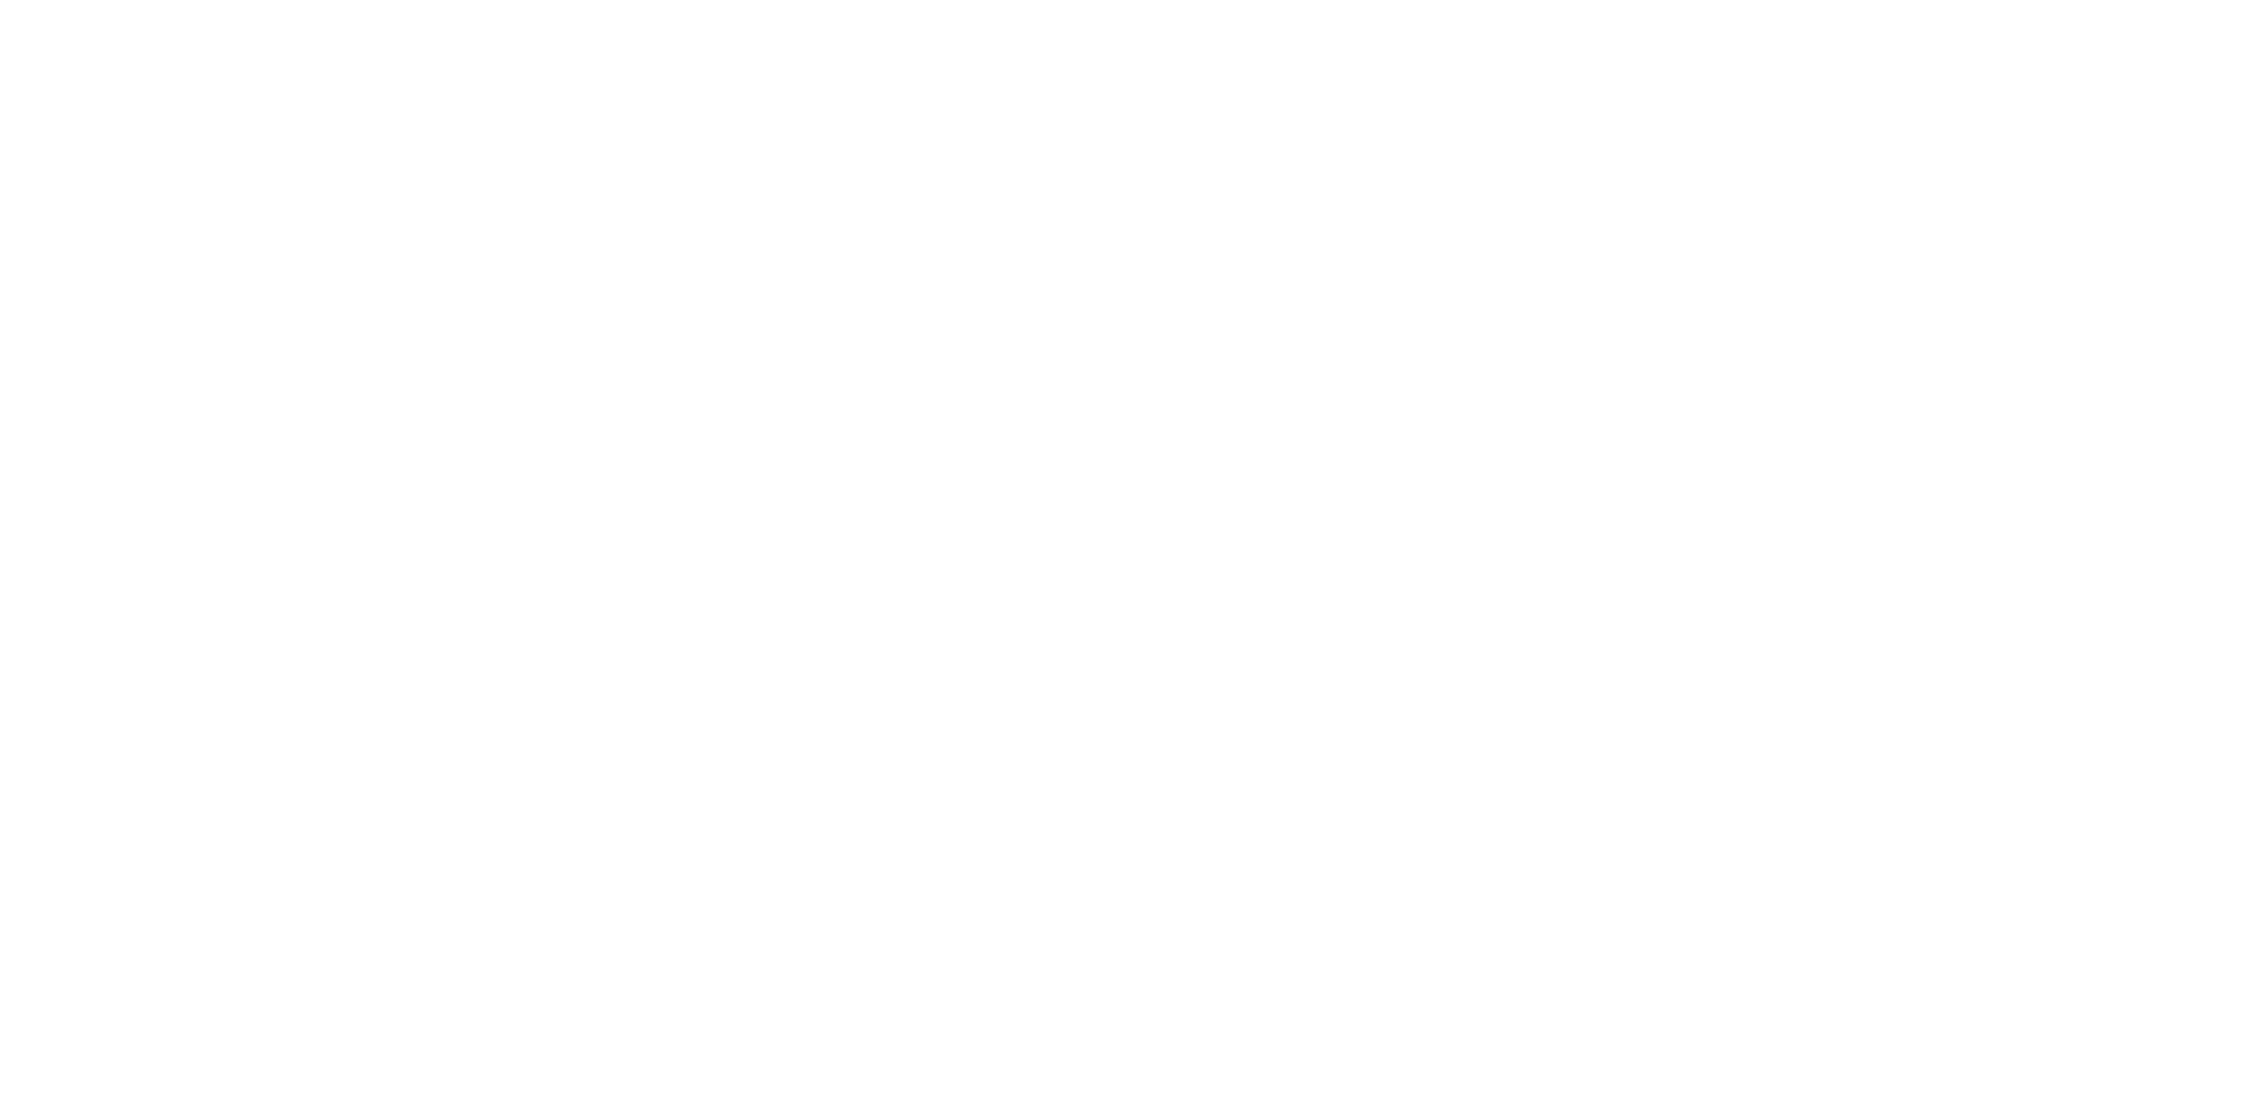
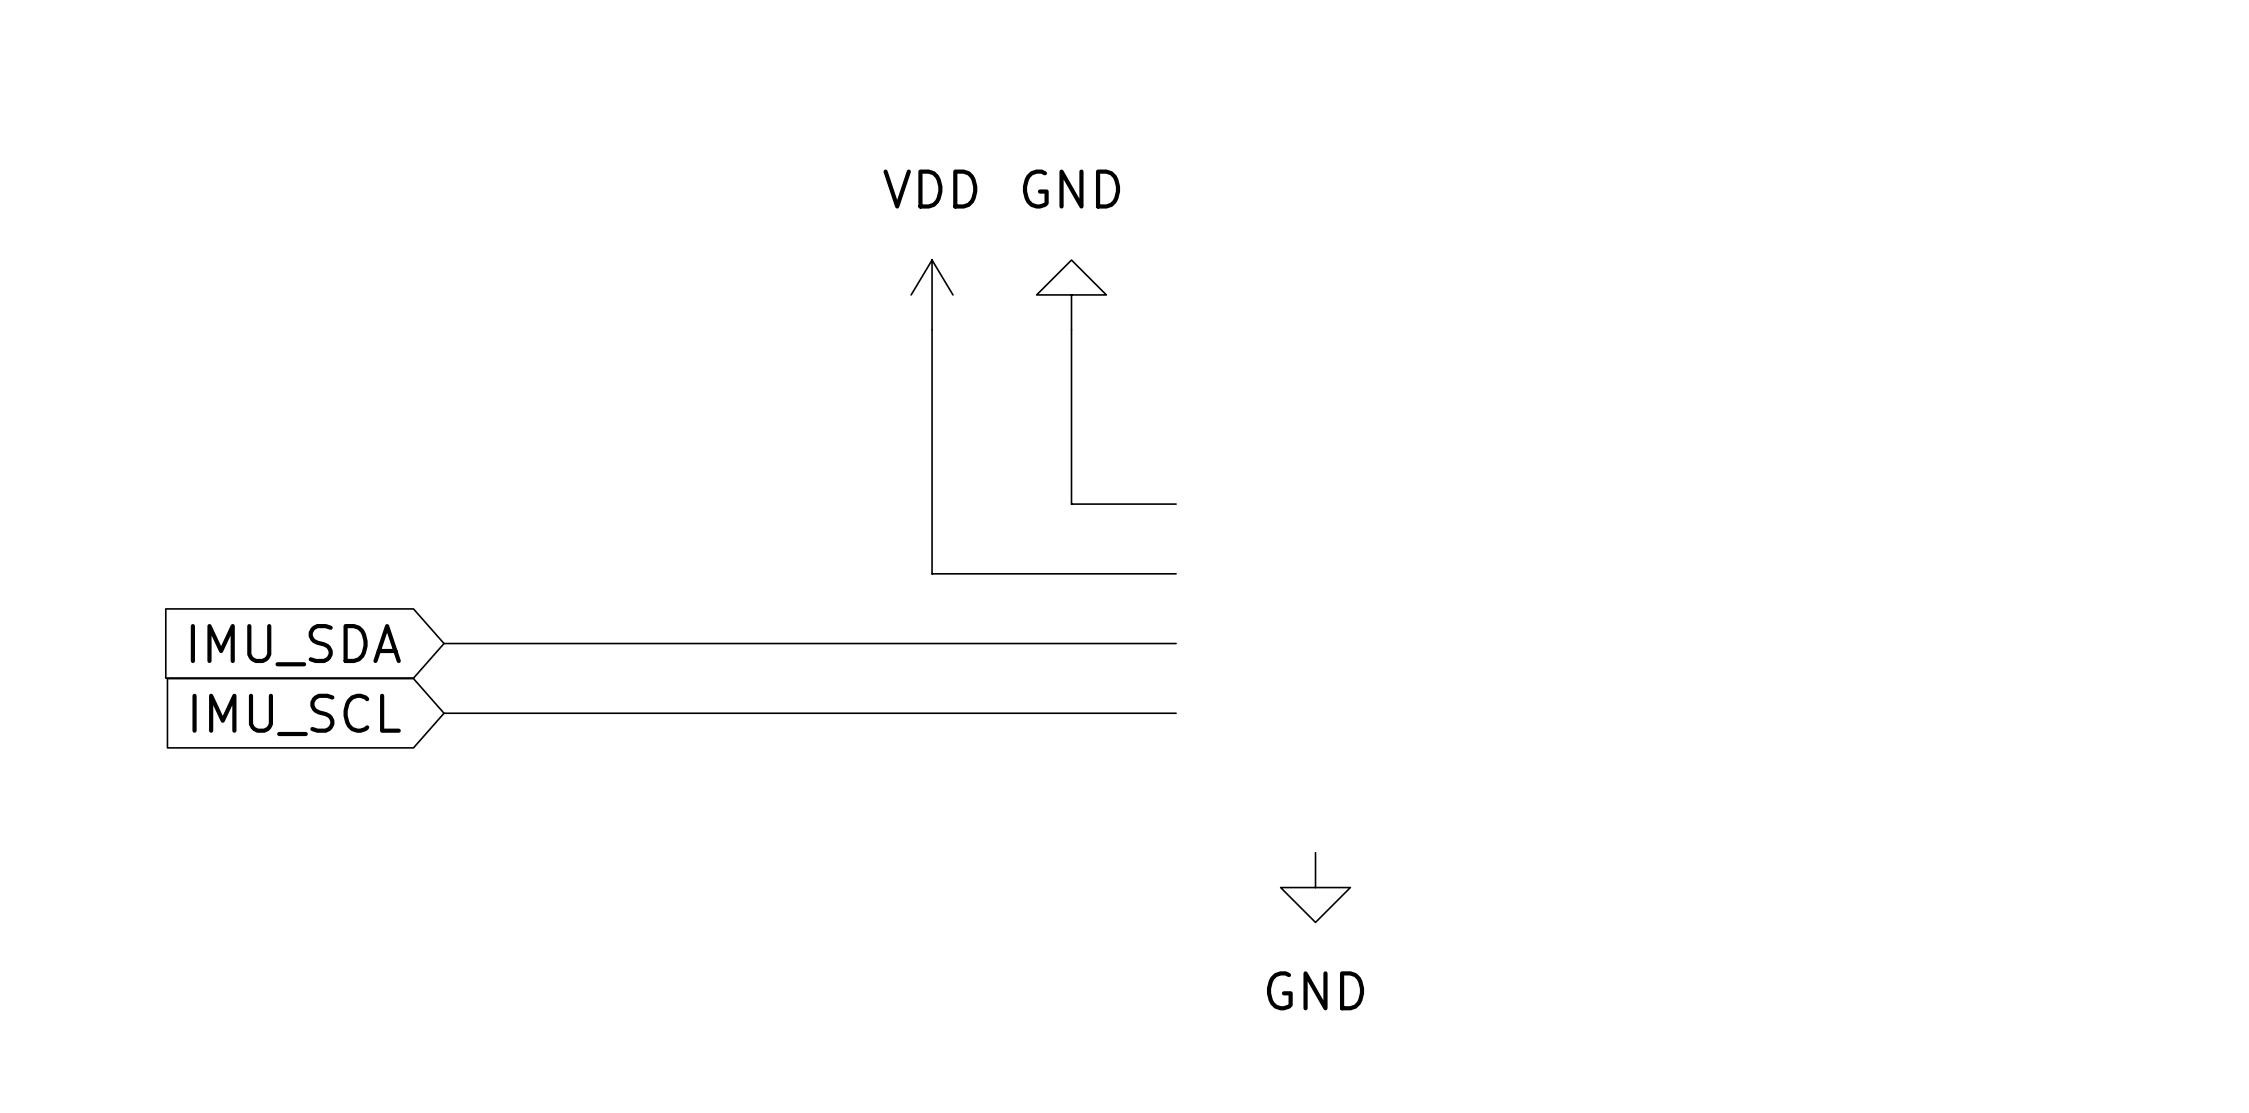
power symbol: none -> VDD (932, 294)
power symbol: none -> GND (1071, 294)
wire: none -> (932, 329) (932, 573) (1176, 573)
wire: none -> (1071, 329) (1071, 504) (1176, 504)
wire: none -> (444, 643) (1176, 643)
global label: none -> IMU_SDA (295, 645)
wire: none -> (444, 713) (1176, 713)
global label: none -> IMU_SCL (296, 714)
power symbol: none -> GND (1315, 887)

